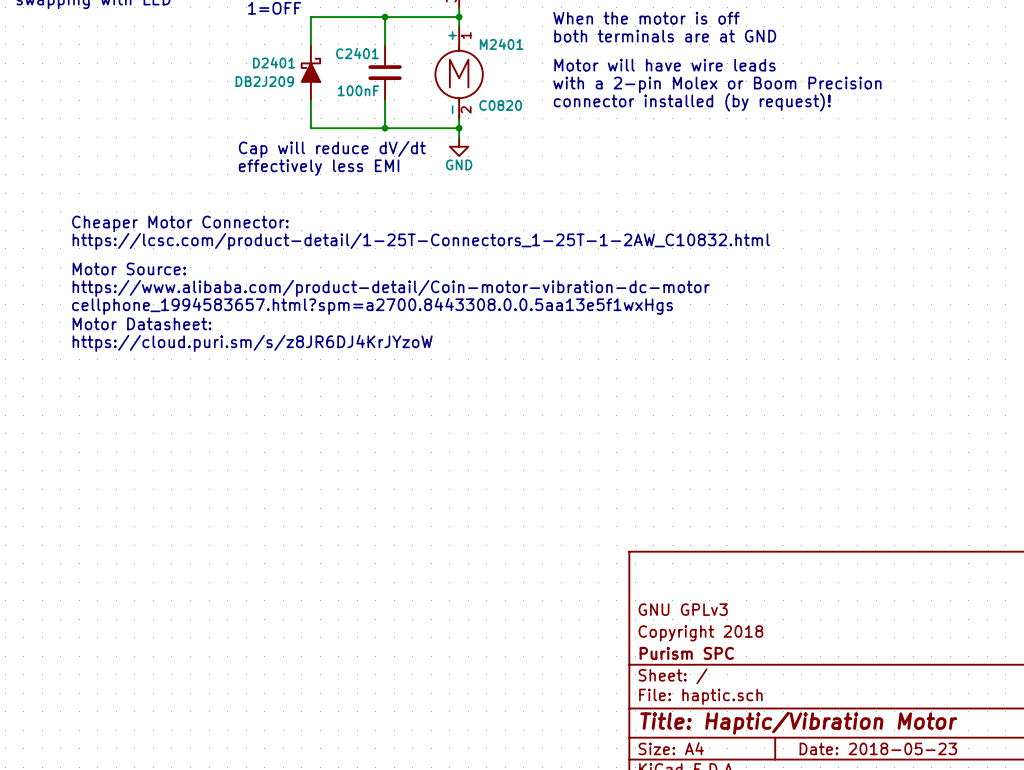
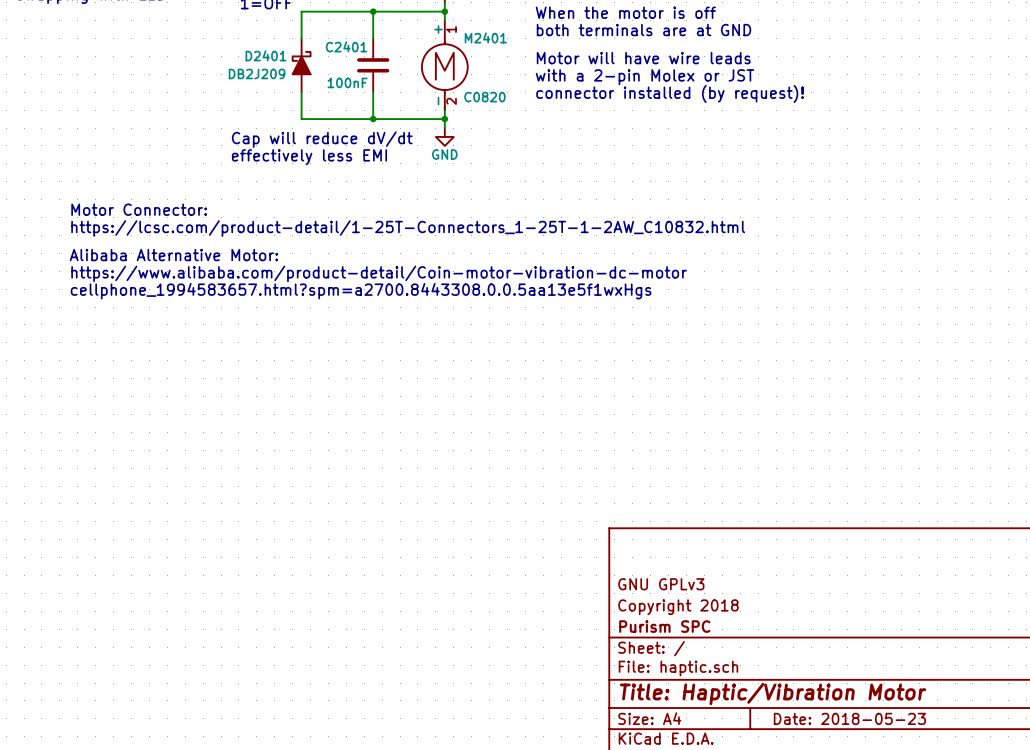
text: with a 2-pin Molex or Boom Precision (717, 84) -> with a 2-pin Molex or JST (645, 77)
text: Cheaper Motor Connector: (180, 223) -> Motor Connector: (139, 209)
text: Motor Source: (129, 268) -> Alibaba Alternative Motor: (173, 255)
text: Motor Datasheet: (142, 323) -> none
text: https://cloud.puri.sm/s/z8JR6DJ4KrJYzoW (252, 343) -> none

